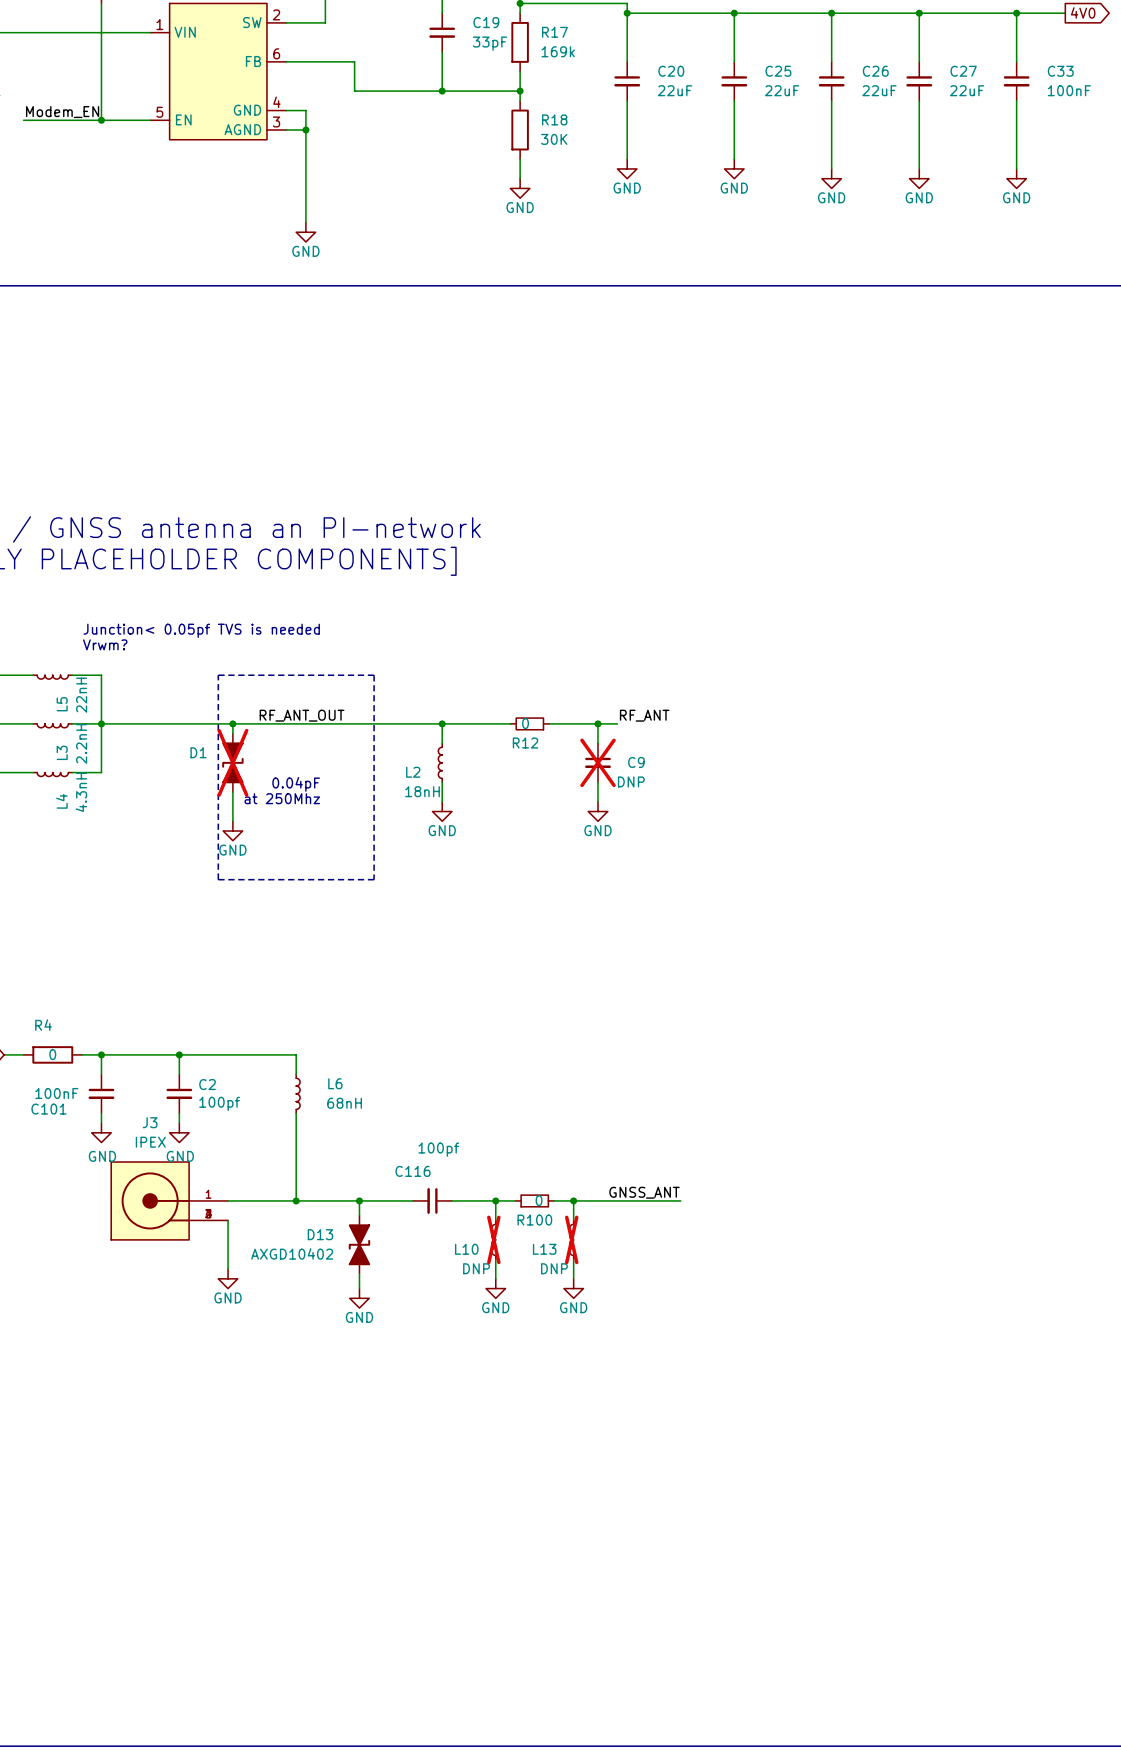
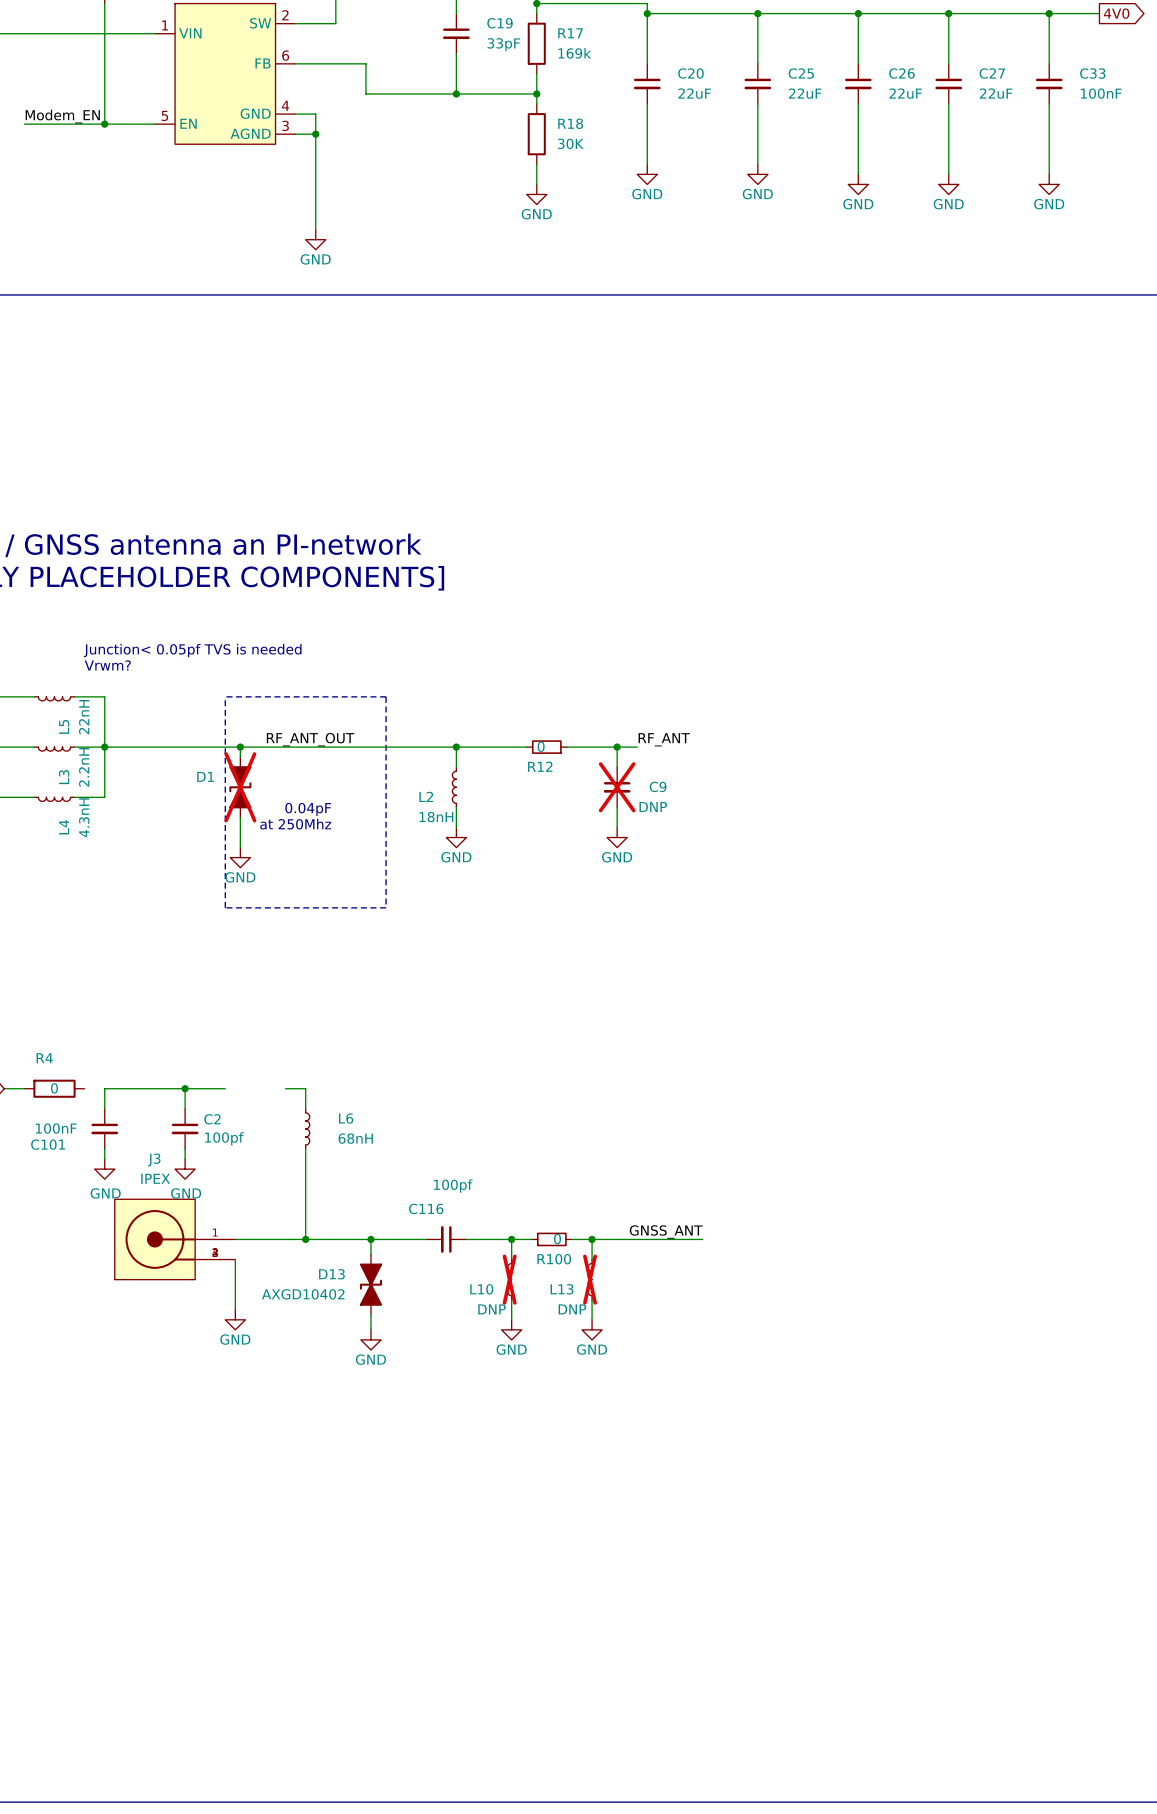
wire: (82, 1054) (101, 1054) -> none
junction: (101, 1054) -> none
wire: (218, 1054) (276, 1054) -> none

